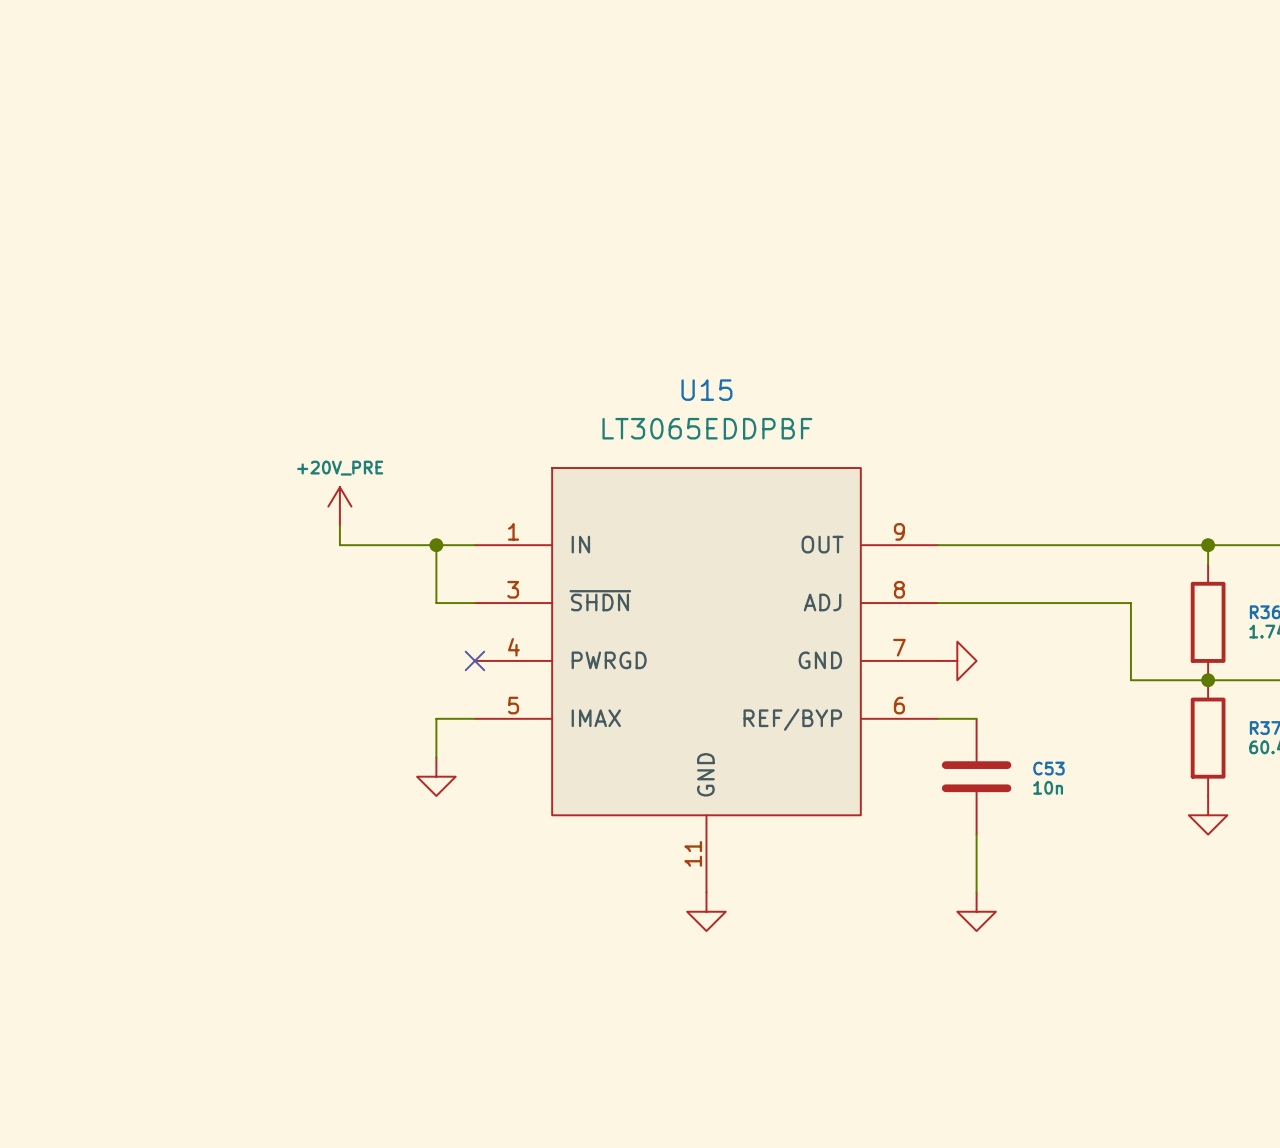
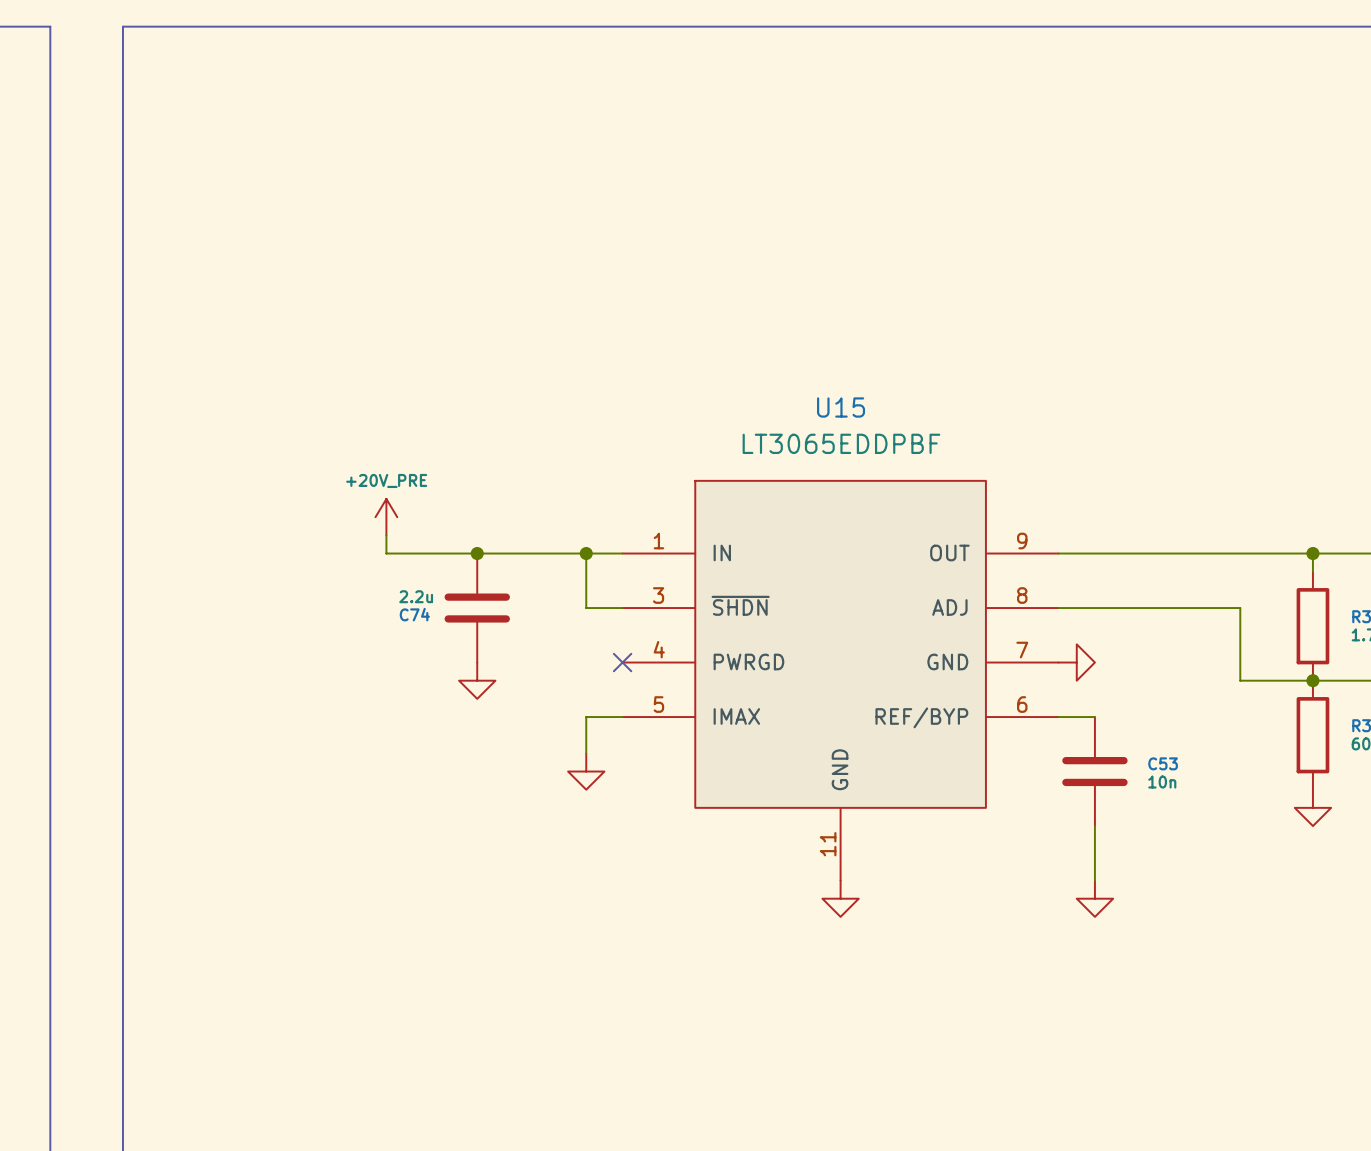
power symbol position: +20V_PRE (339, 506) -> +20V_PRE (386, 517)
wire: (339, 525) (339, 545) -> (386, 535) (386, 553) (495, 553)
junction: none -> (477, 553)
C74: none -> 2.2u (477, 608)
power symbol: none -> (477, 680)

